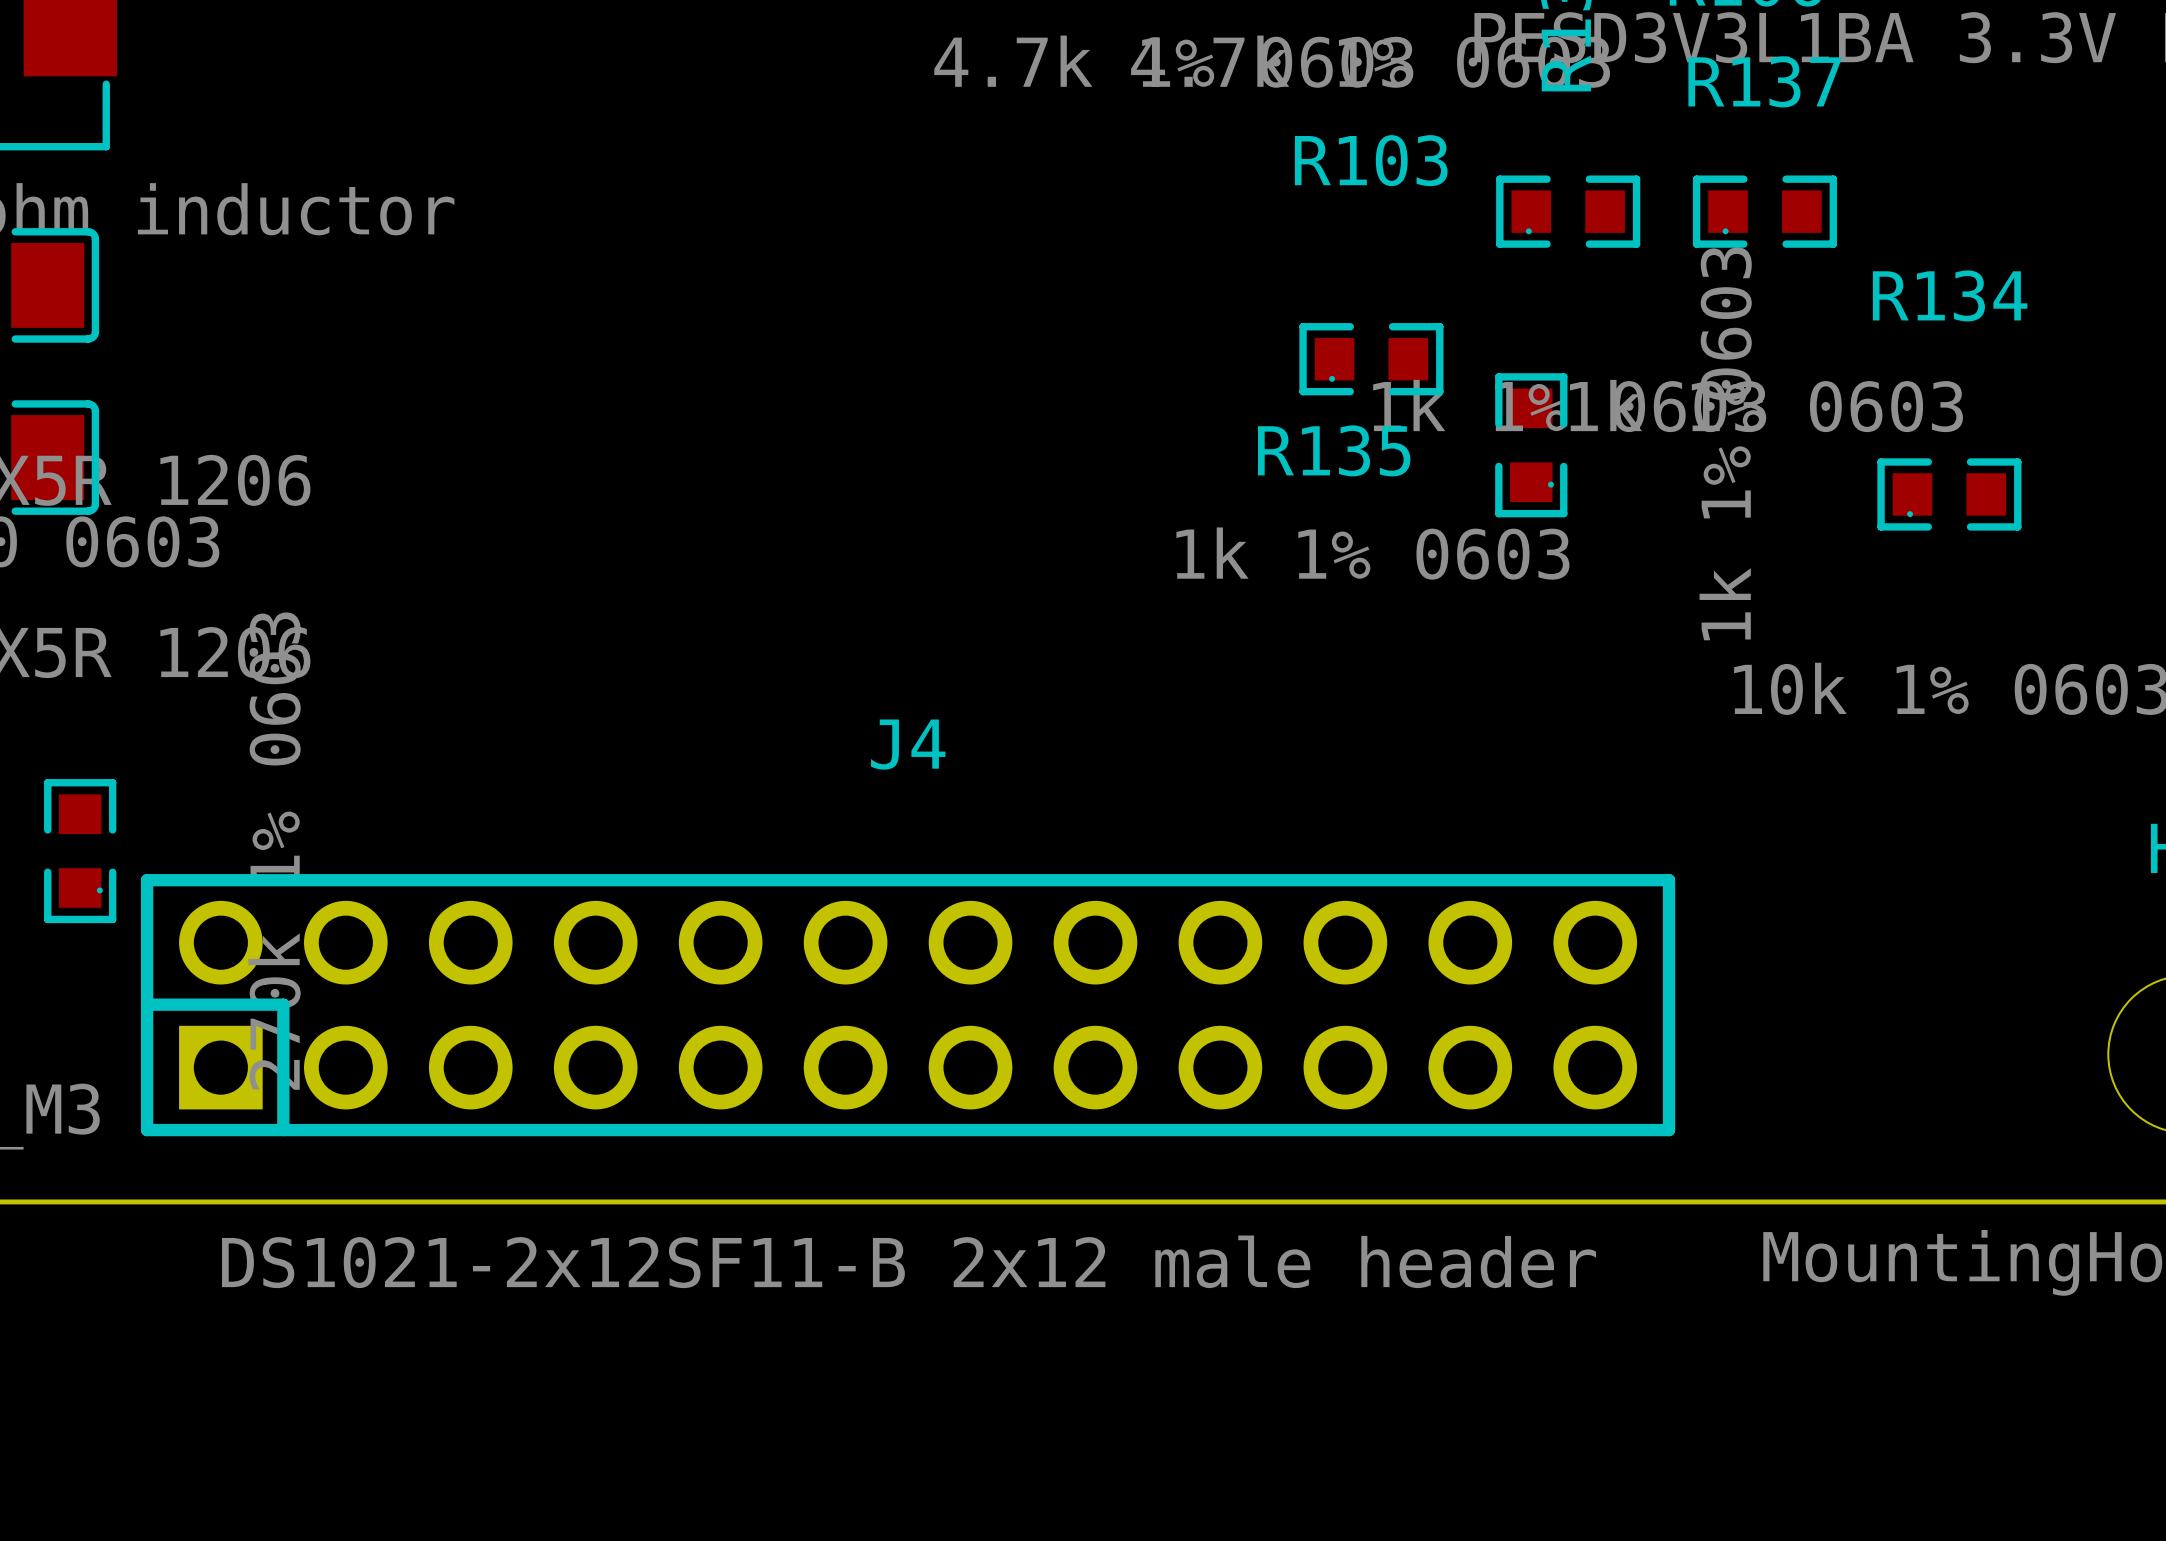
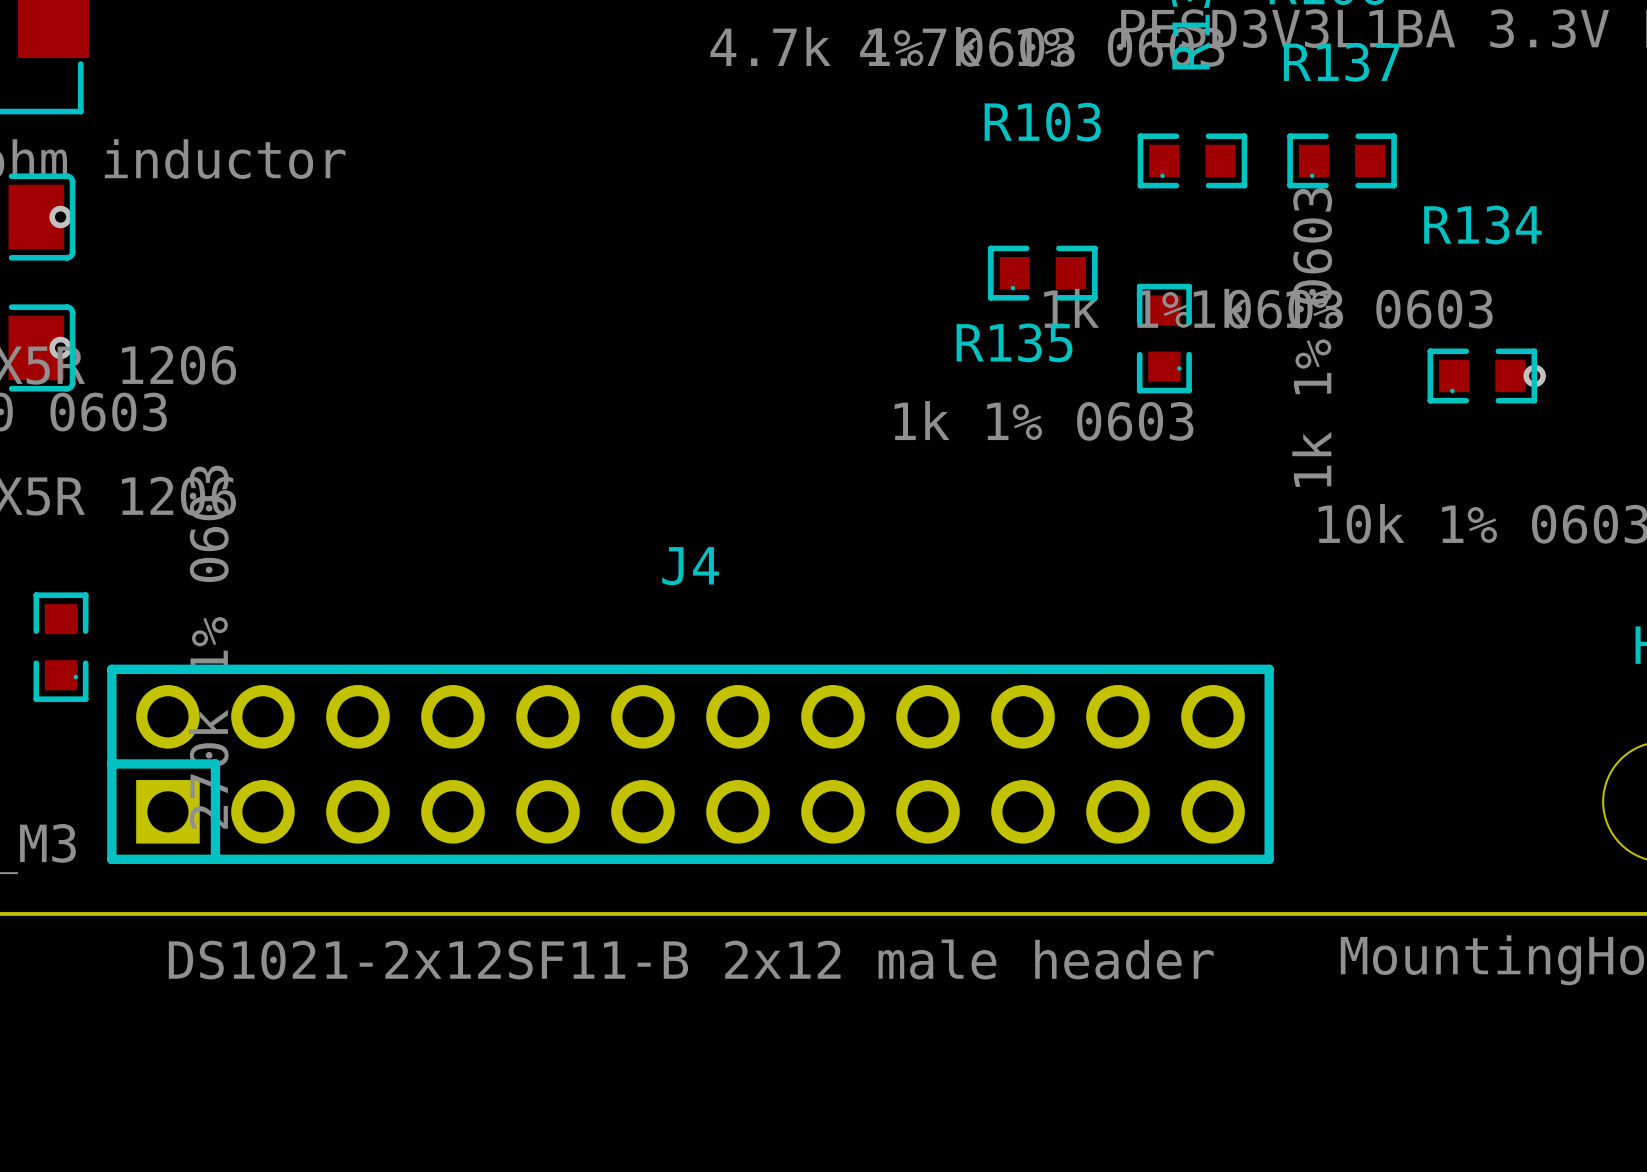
via: none -> (60, 217)
via: none -> (60, 347)
via: none -> (1534, 375)

